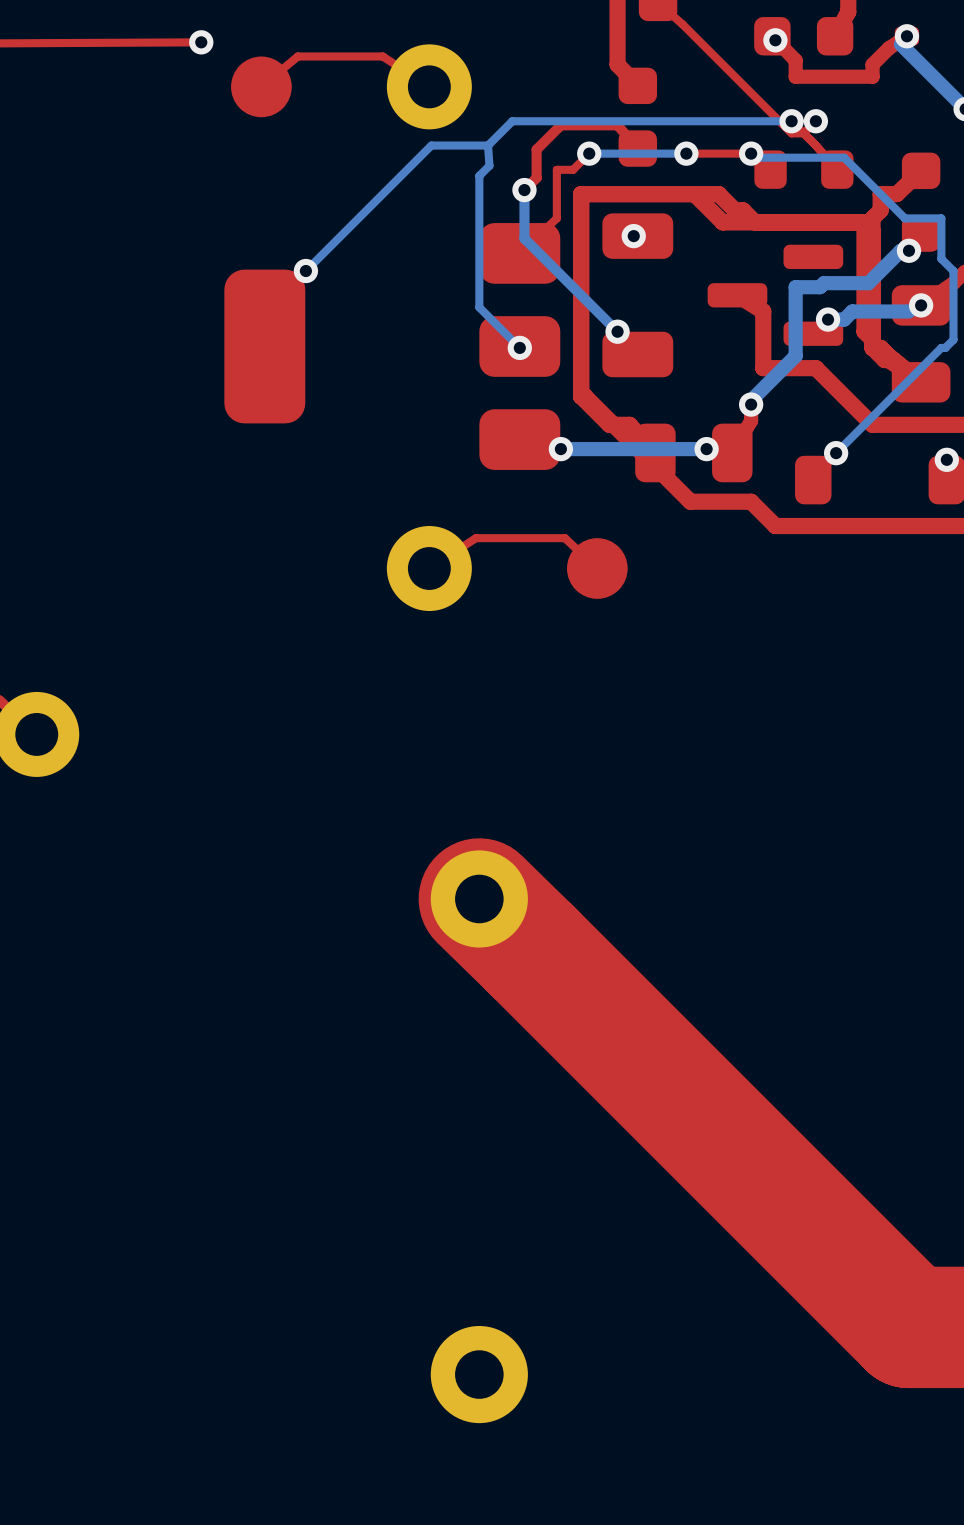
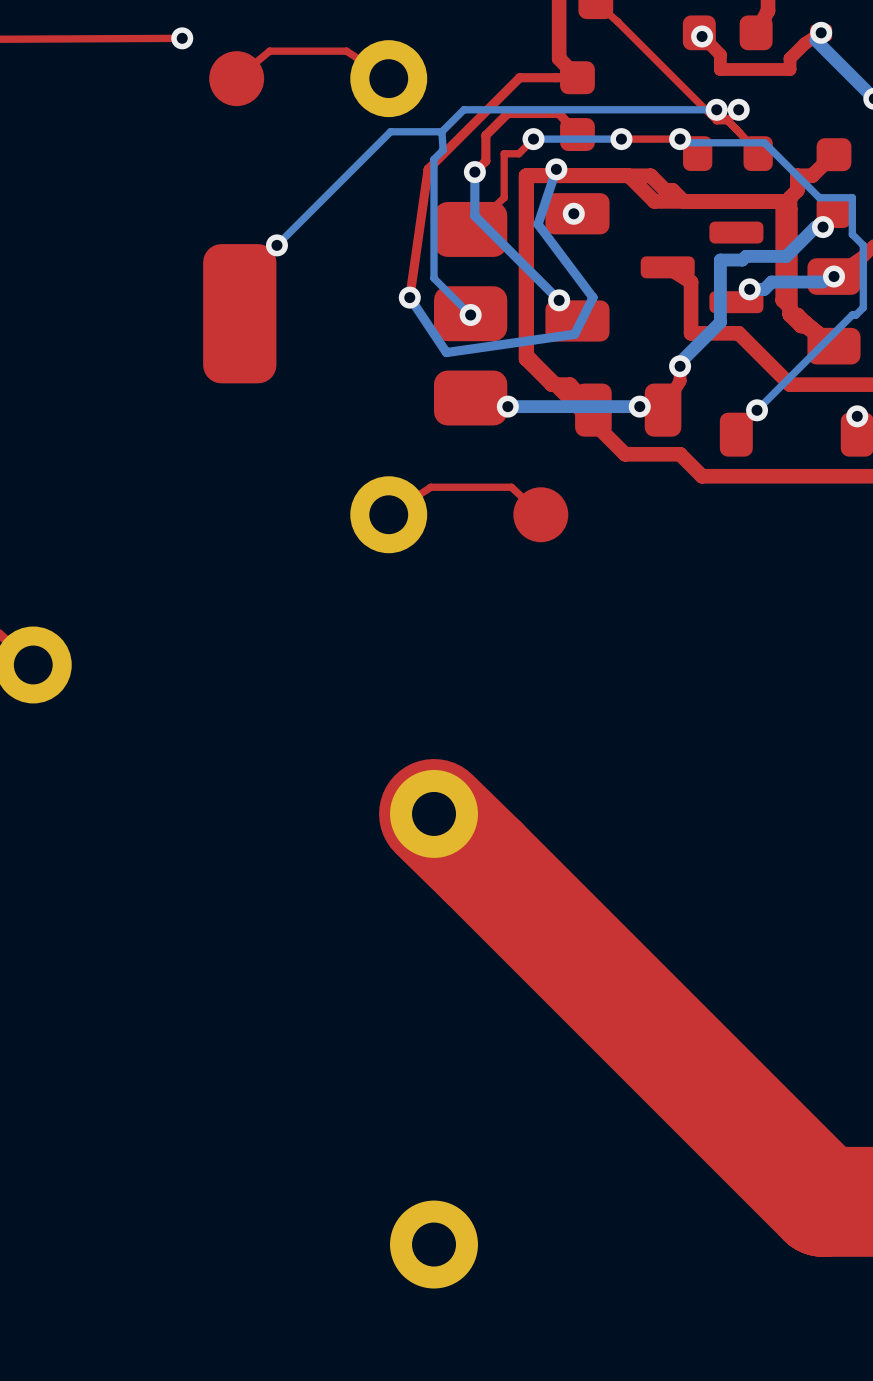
top track: none -> (577, 77) (519, 77) (428, 169) (409, 297)
bottom track: none -> (556, 169) (538, 224) (593, 297) (574, 334) (446, 352) (409, 297)
via: none -> (556, 169)
via: none -> (409, 297)

